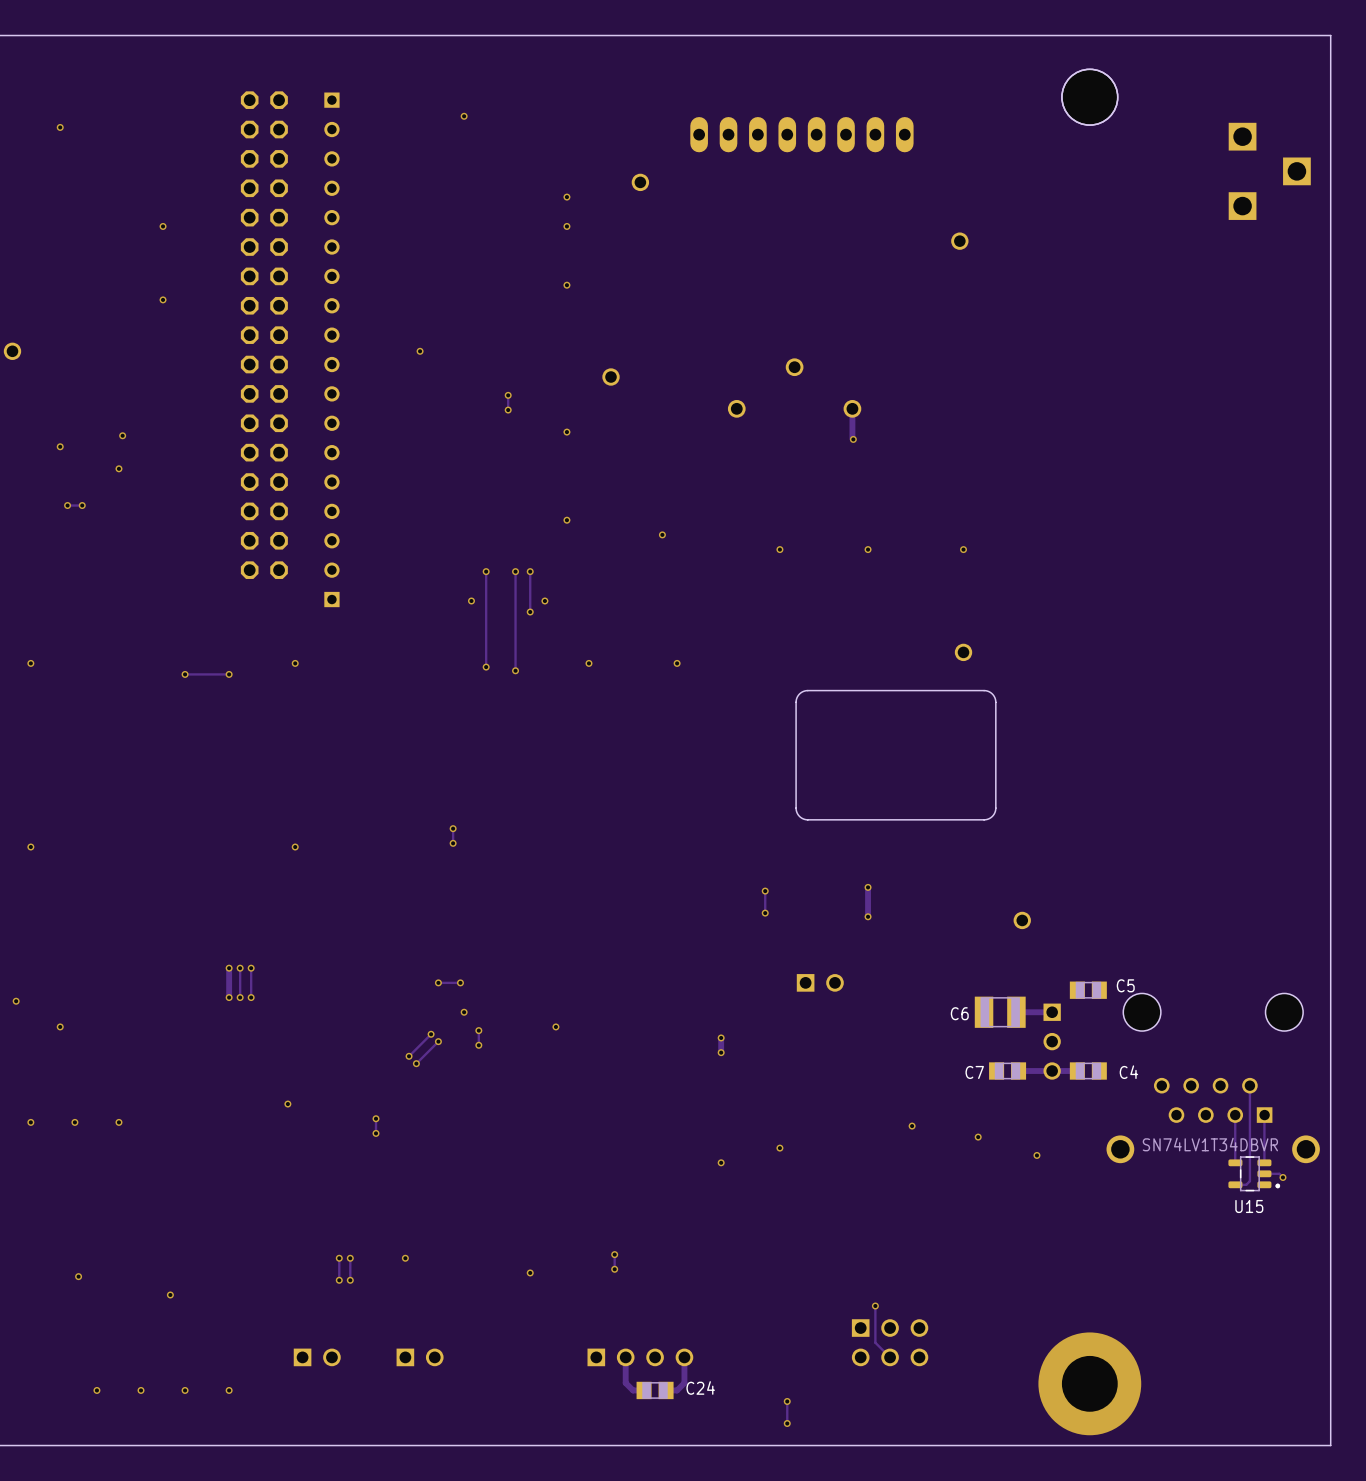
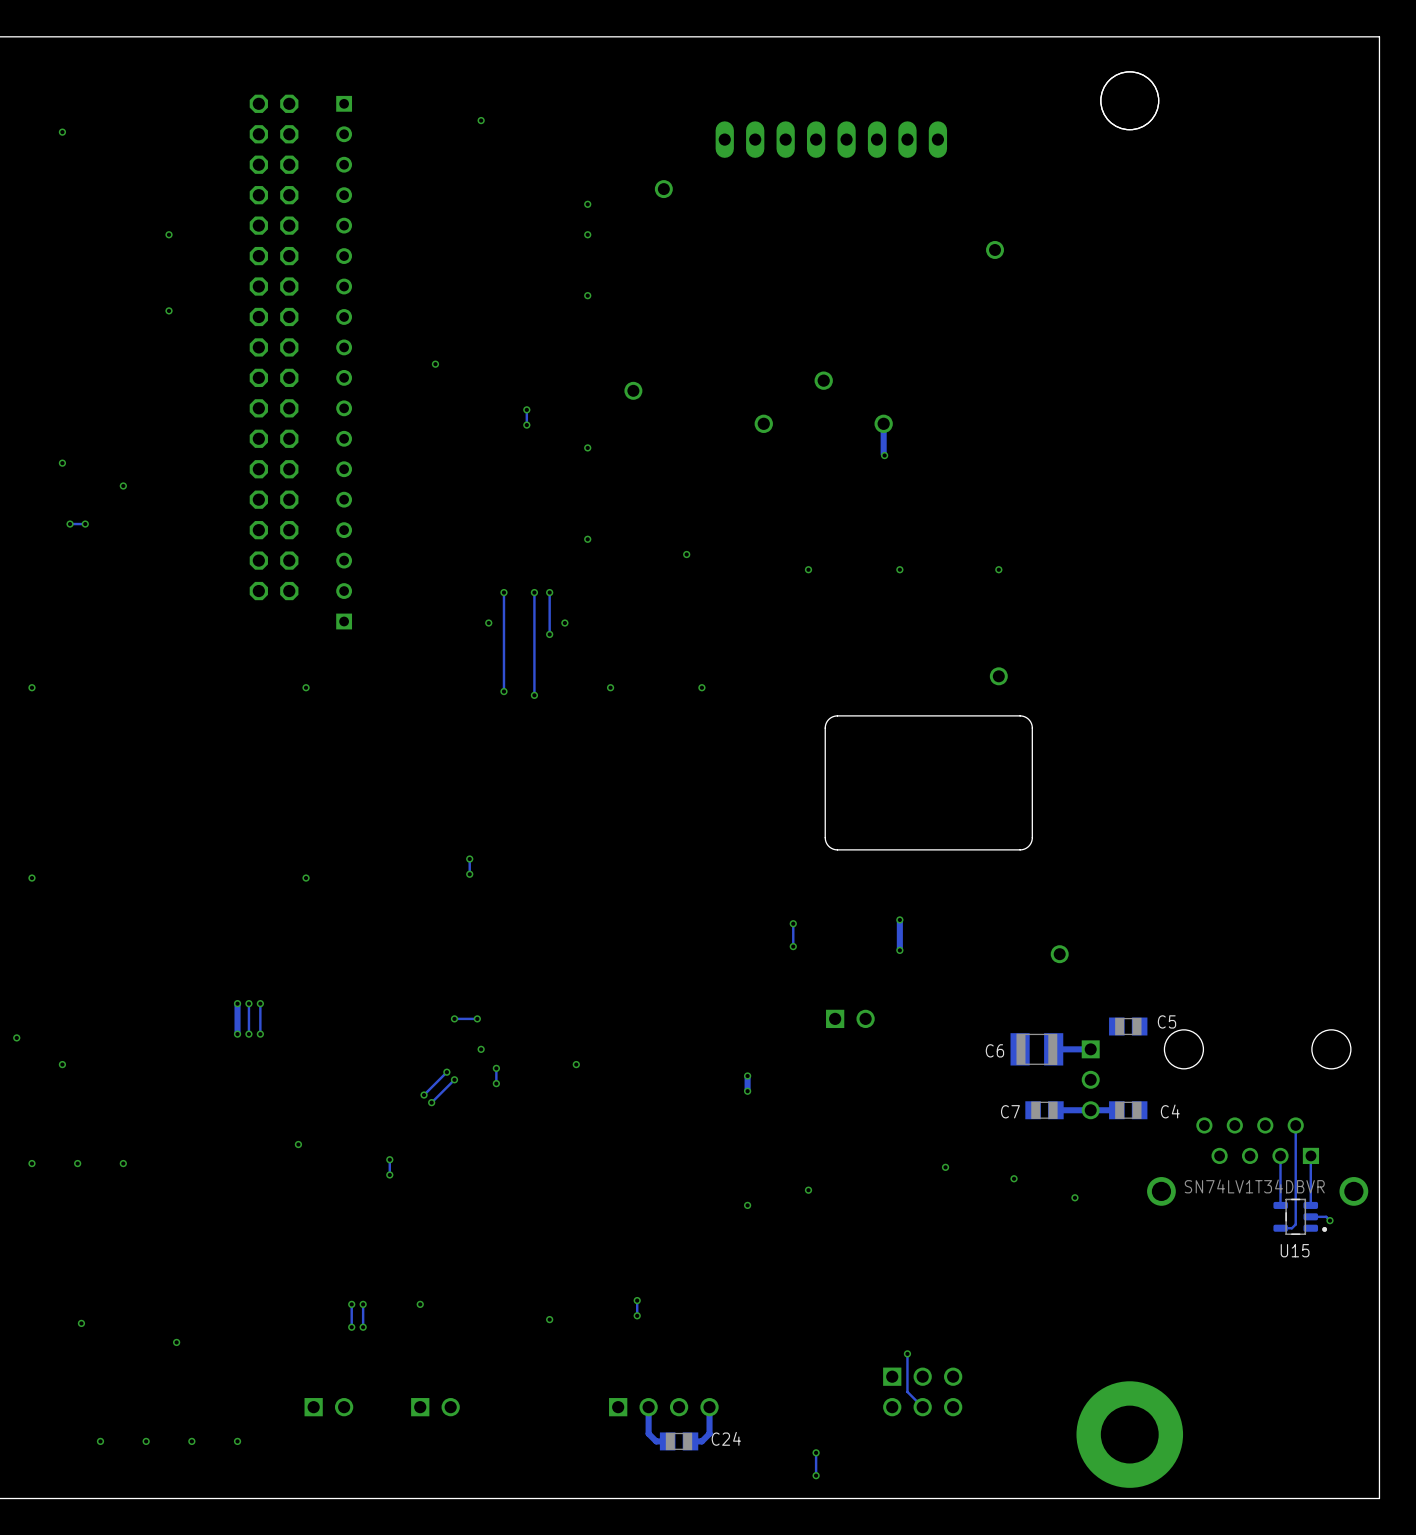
part: (1269, 171) -> none
part: (12, 351) -> none
via: (122, 435) -> none
via: (185, 674) -> none
track: (229, 674) (185, 674) -> none
via: (229, 674) -> none

